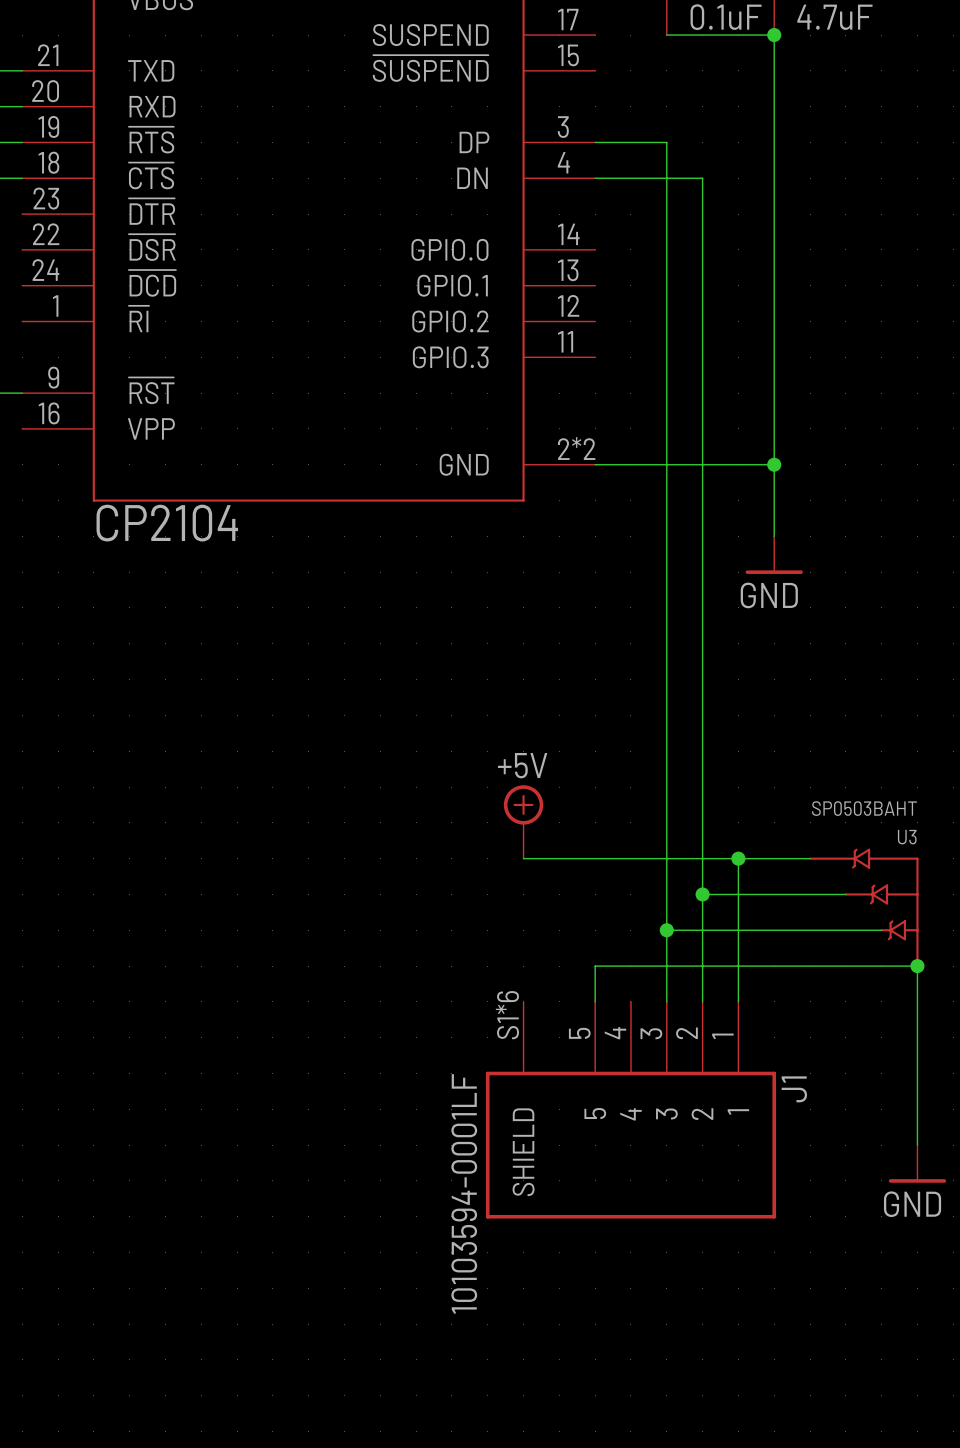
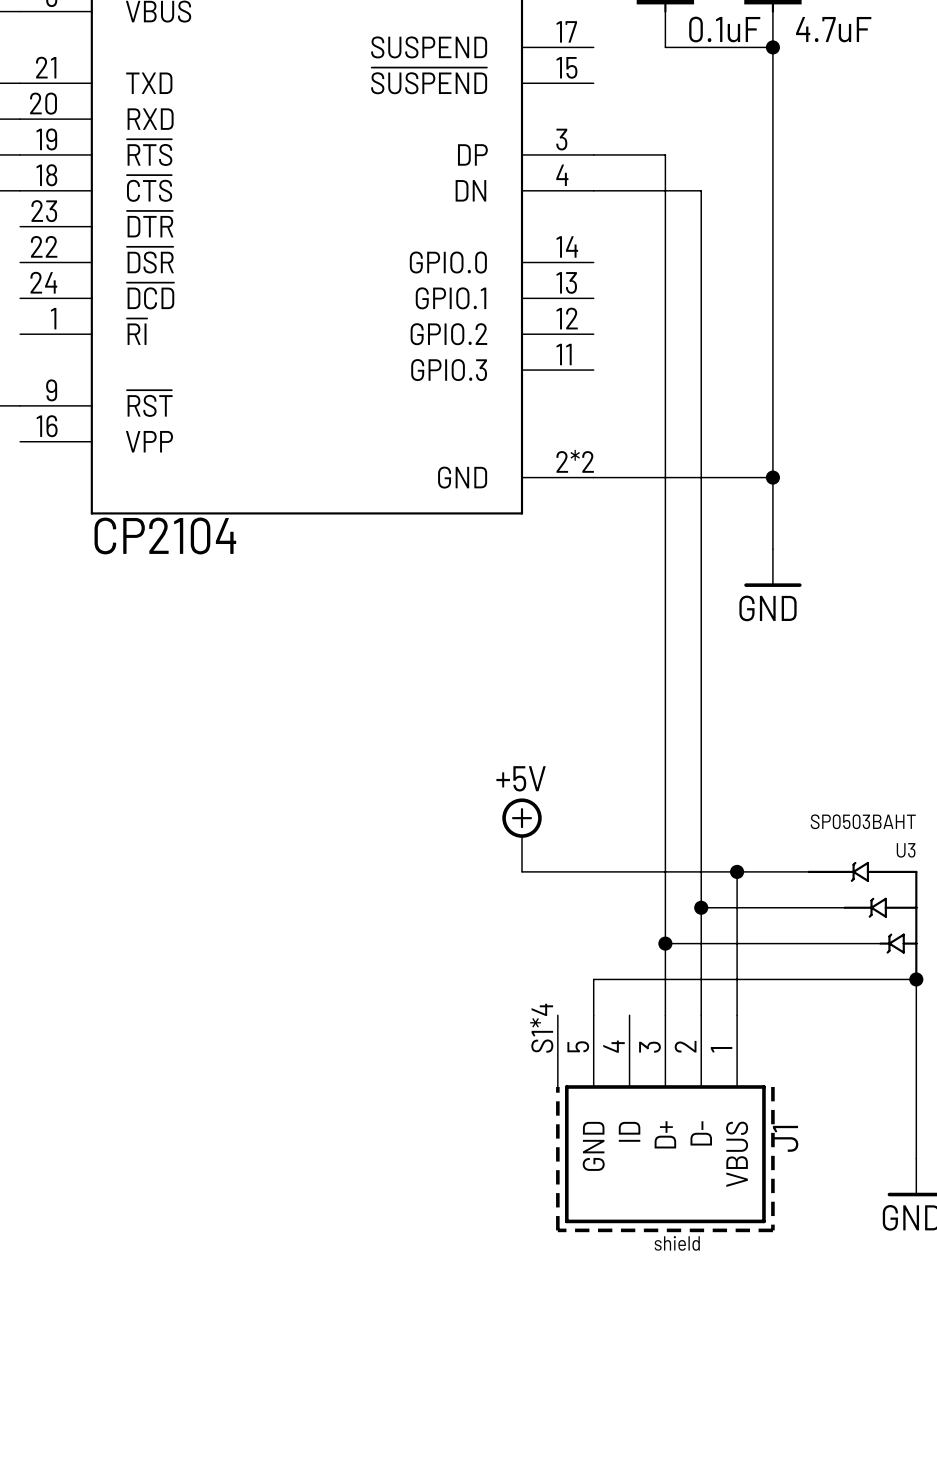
J1 symbol: [485, 1001, 777, 1219] -> [556, 1015, 775, 1233]
J1 name position: J1 (794, 1089) -> J1 (785, 1138)
J1 value: 10103594-0001LF (464, 1193) -> none

